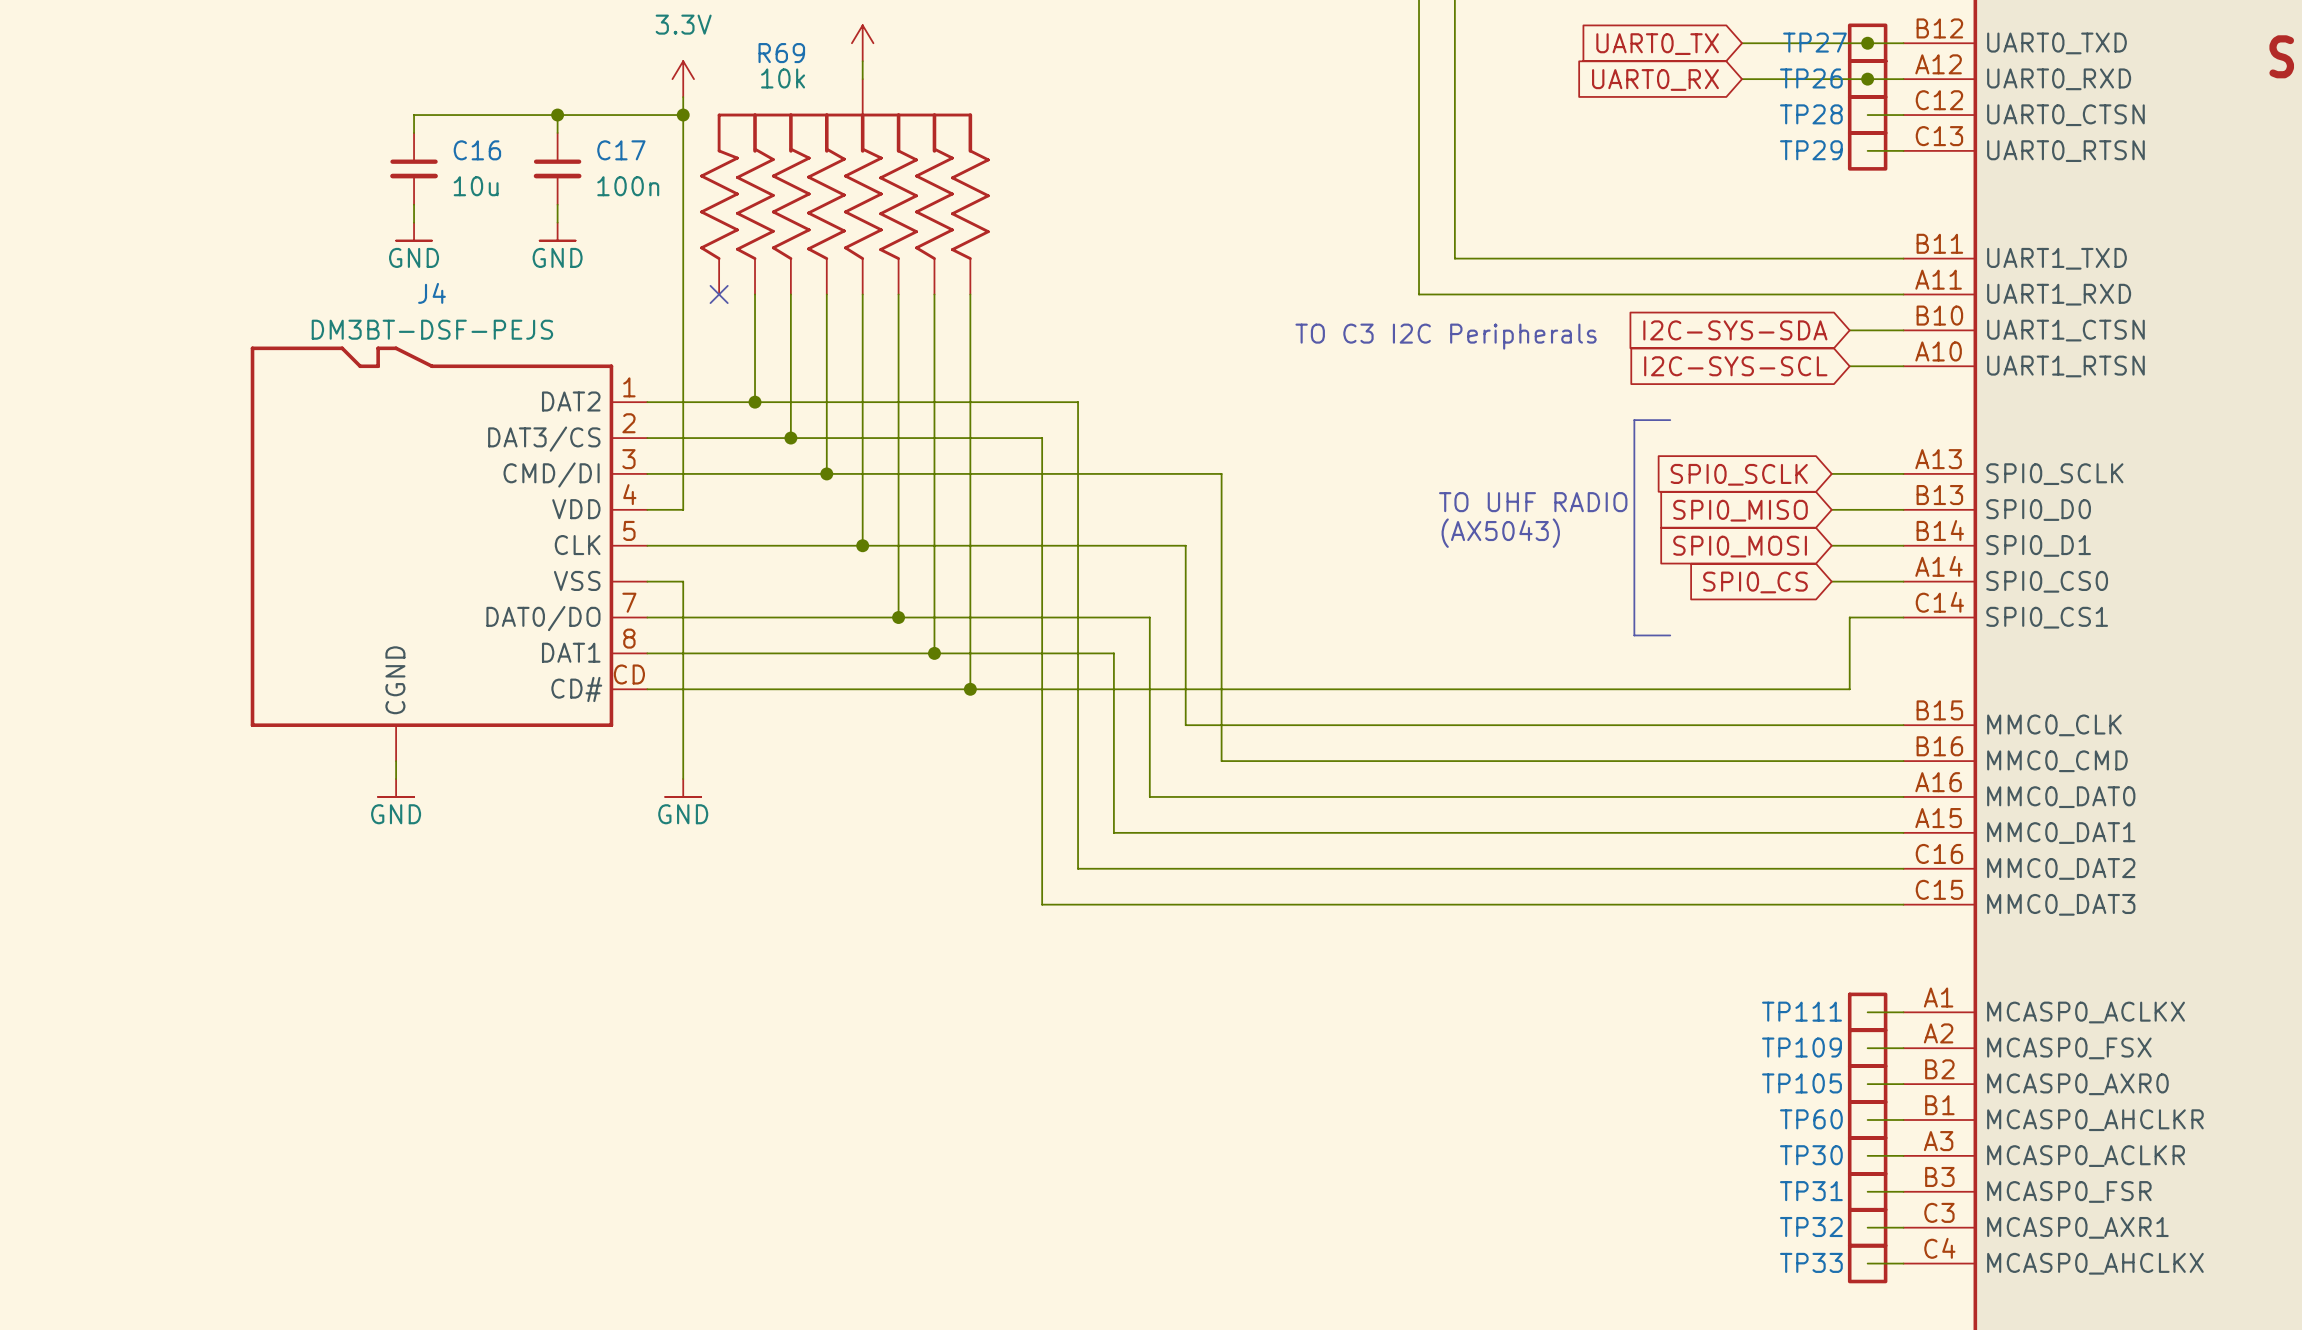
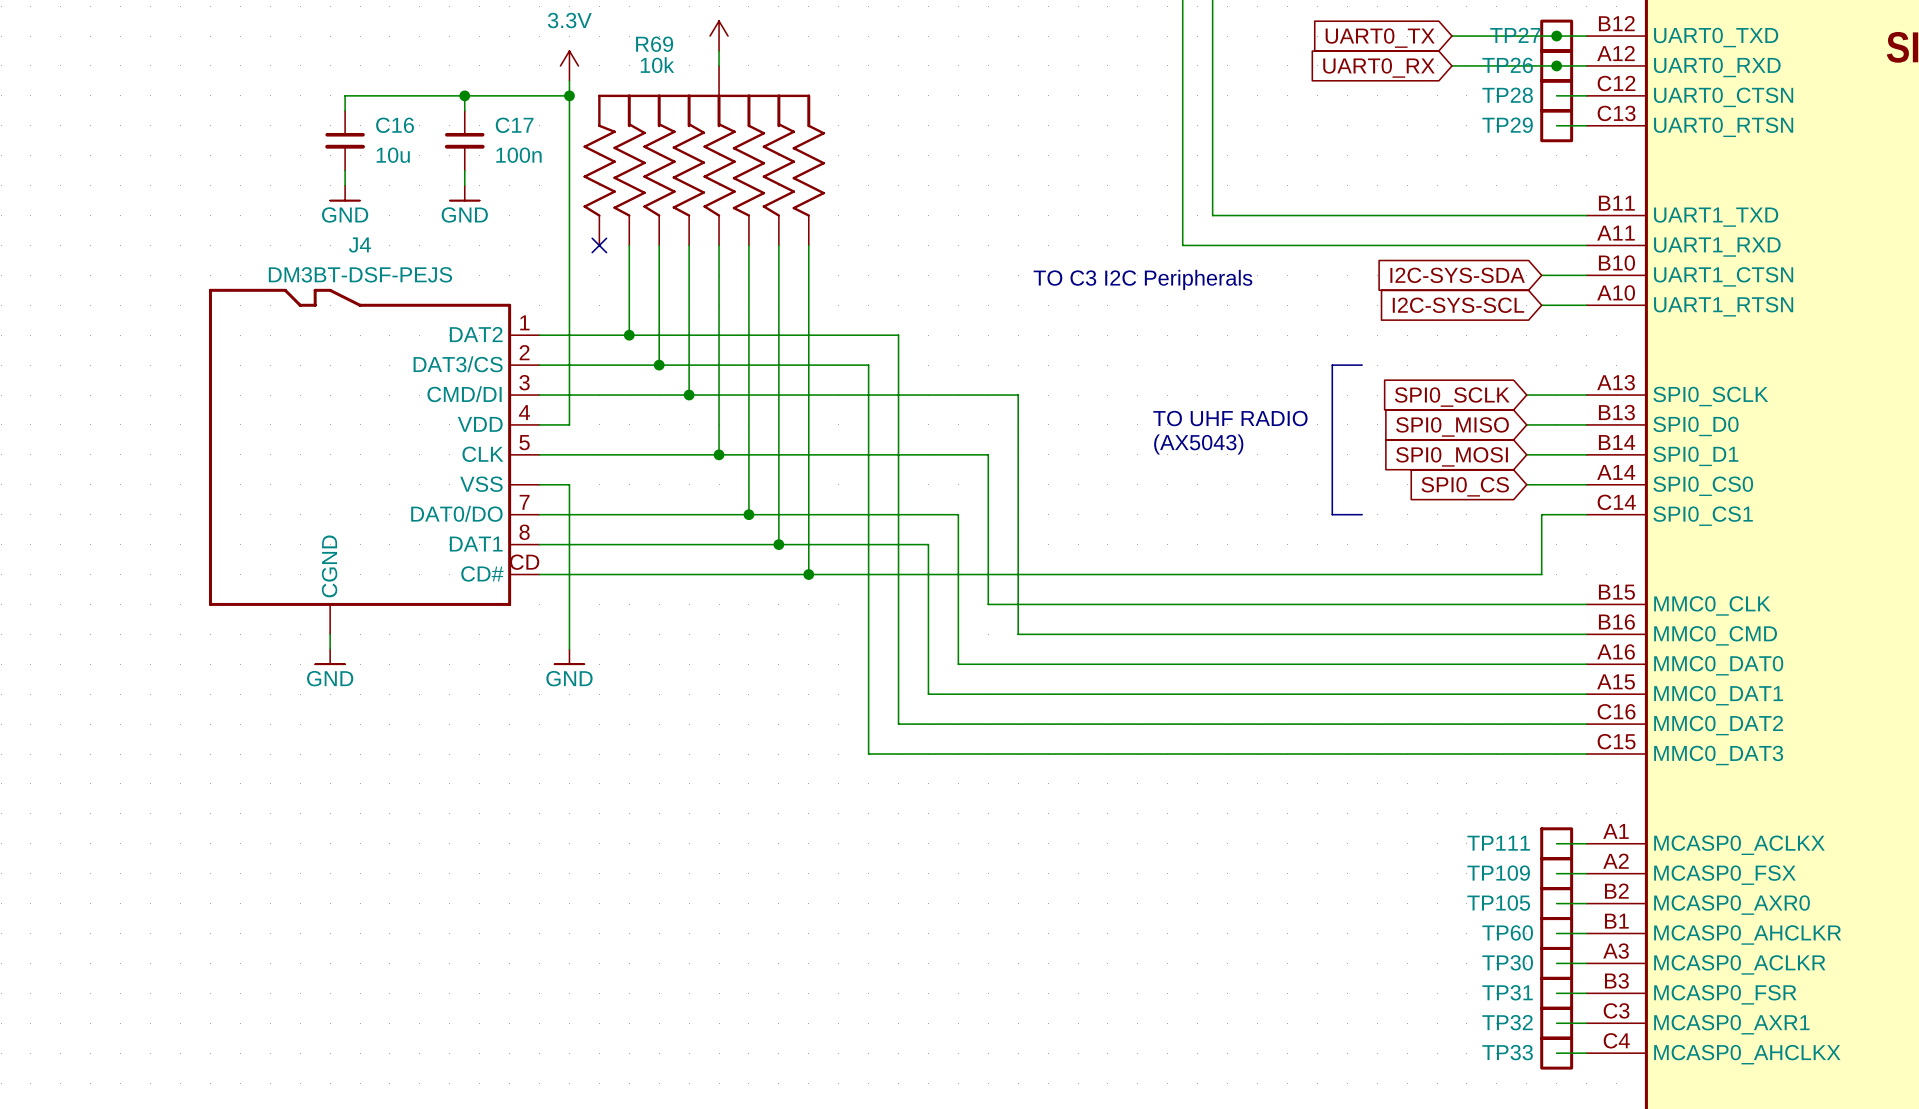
text position: TO C3 I2C Peripherals (1446, 336) -> TO C3 I2C Peripherals (1142, 279)
line: (1670, 420) (1634, 420) (1634, 635) (1670, 635) -> none
line: none -> (1362, 365) (1332, 365) (1332, 514) (1362, 514)
text position: TO UHF RADIO (1533, 502) -> TO UHF RADIO (1230, 418)
text position: (AX5043) (1500, 533) -> (AX5043) (1198, 444)

